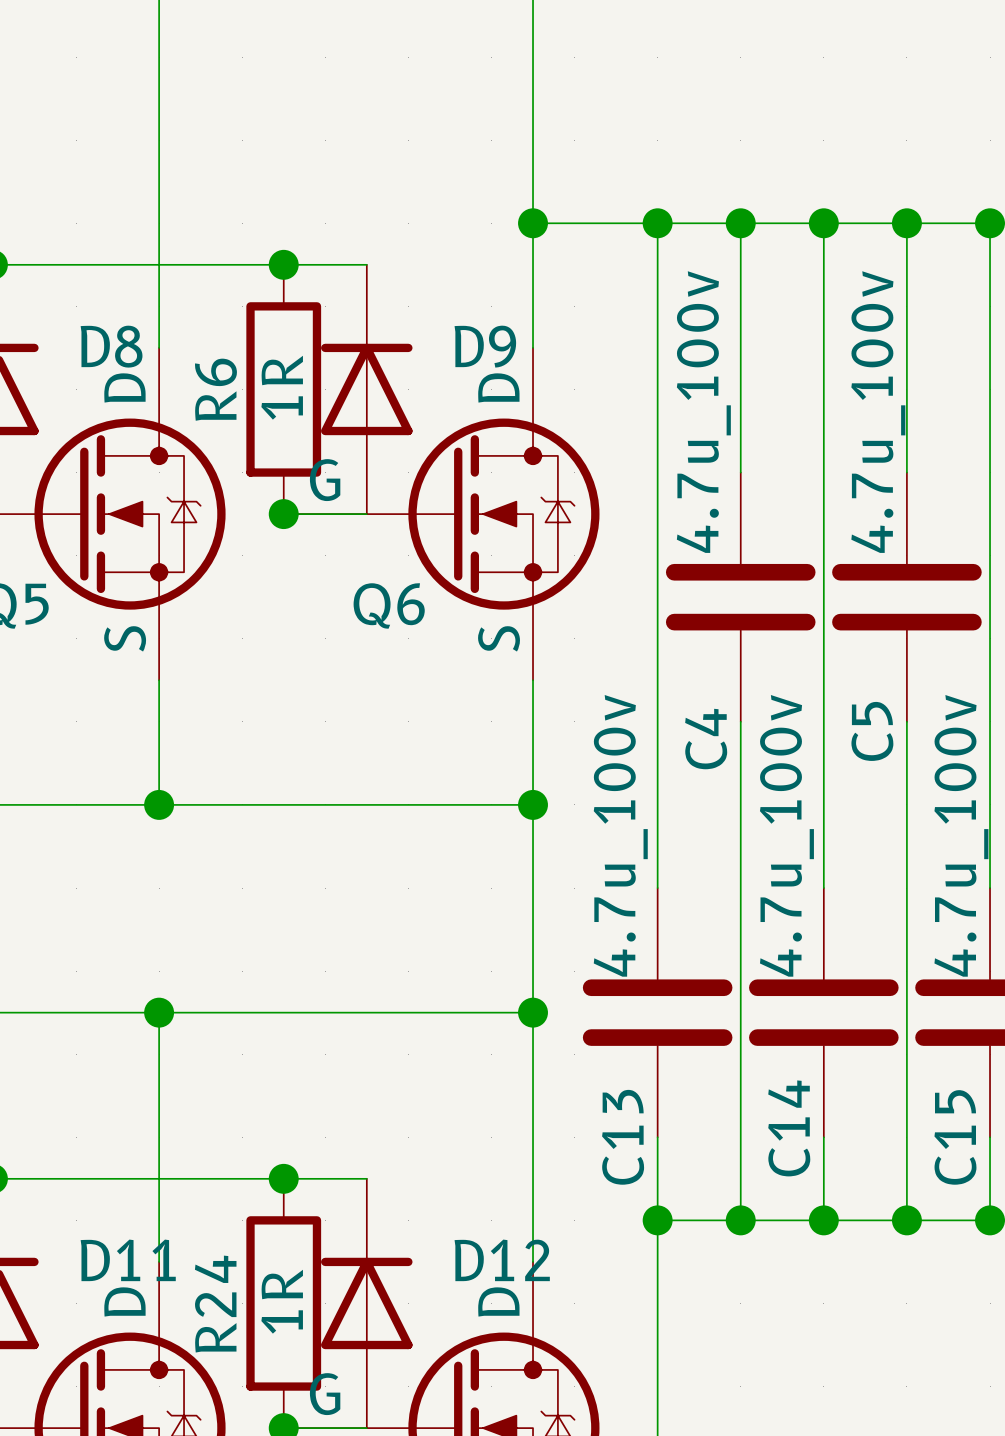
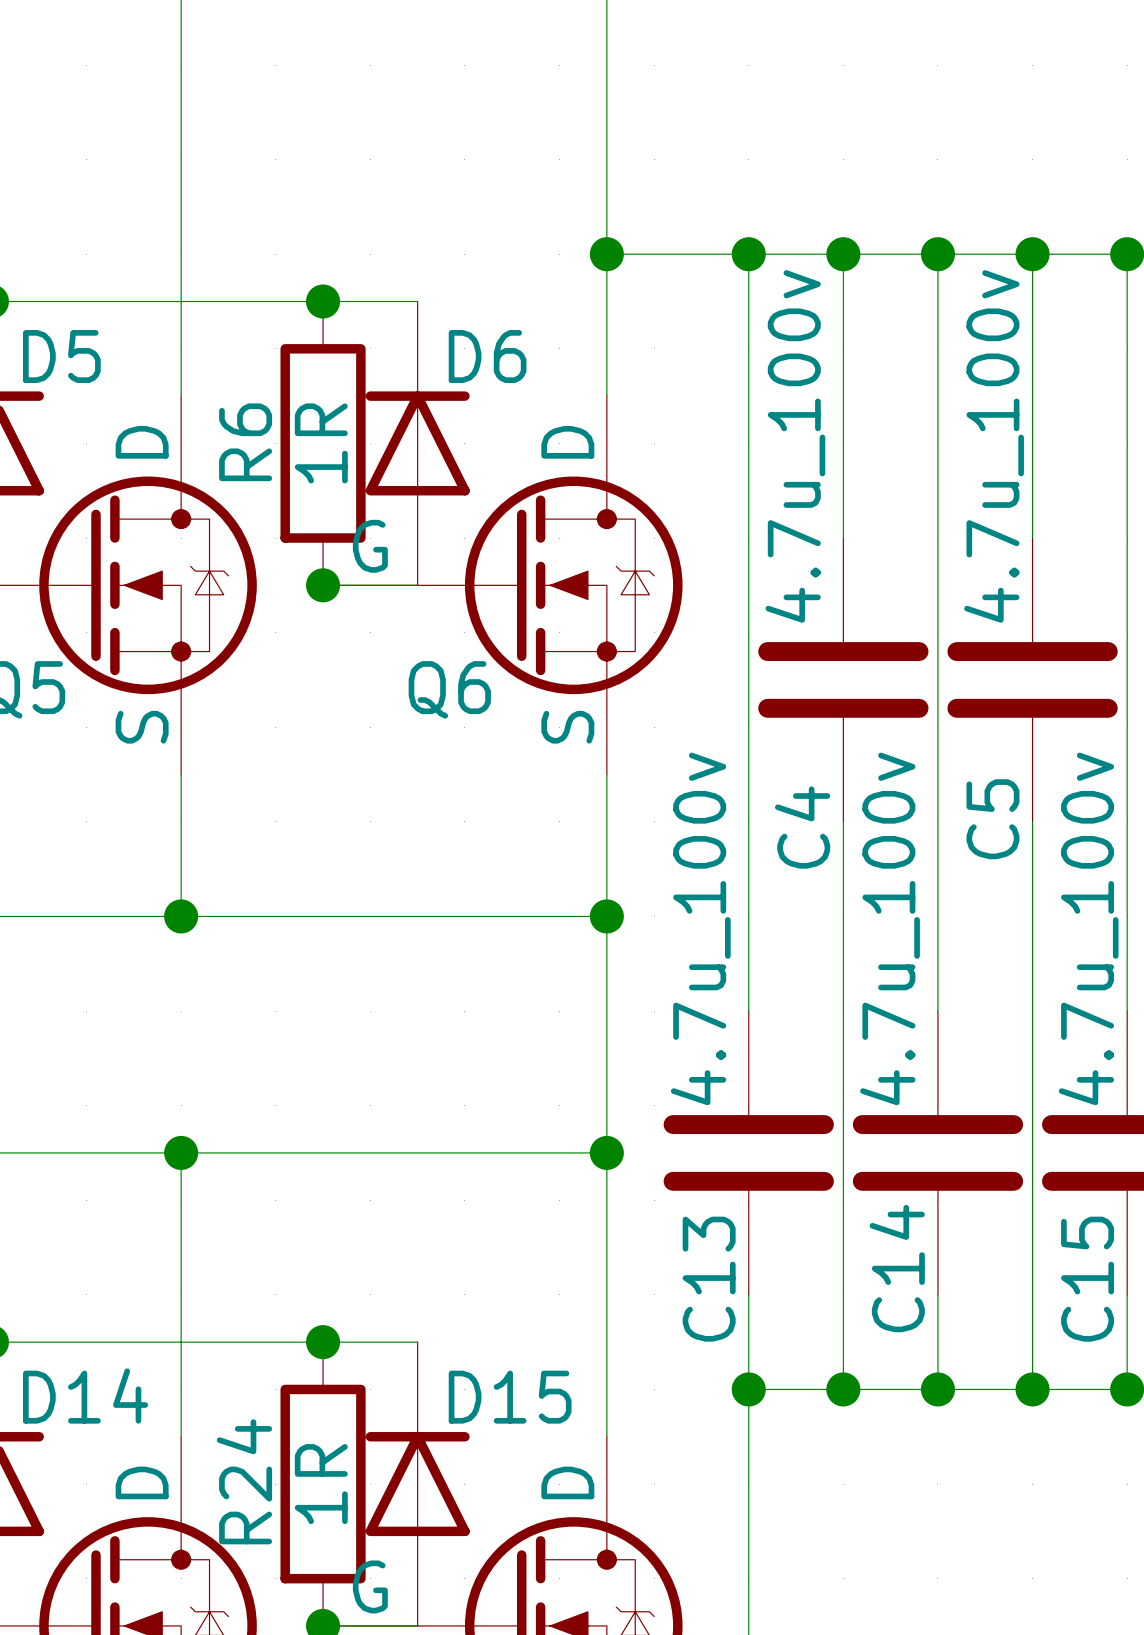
D8 name: D8 (111, 346) -> D5 (61, 356)
D9 name: D9 (485, 346) -> D6 (487, 356)
D11 name: D11 (128, 1260) -> D14 (85, 1396)
D12 name: D12 (502, 1260) -> D15 (510, 1397)

